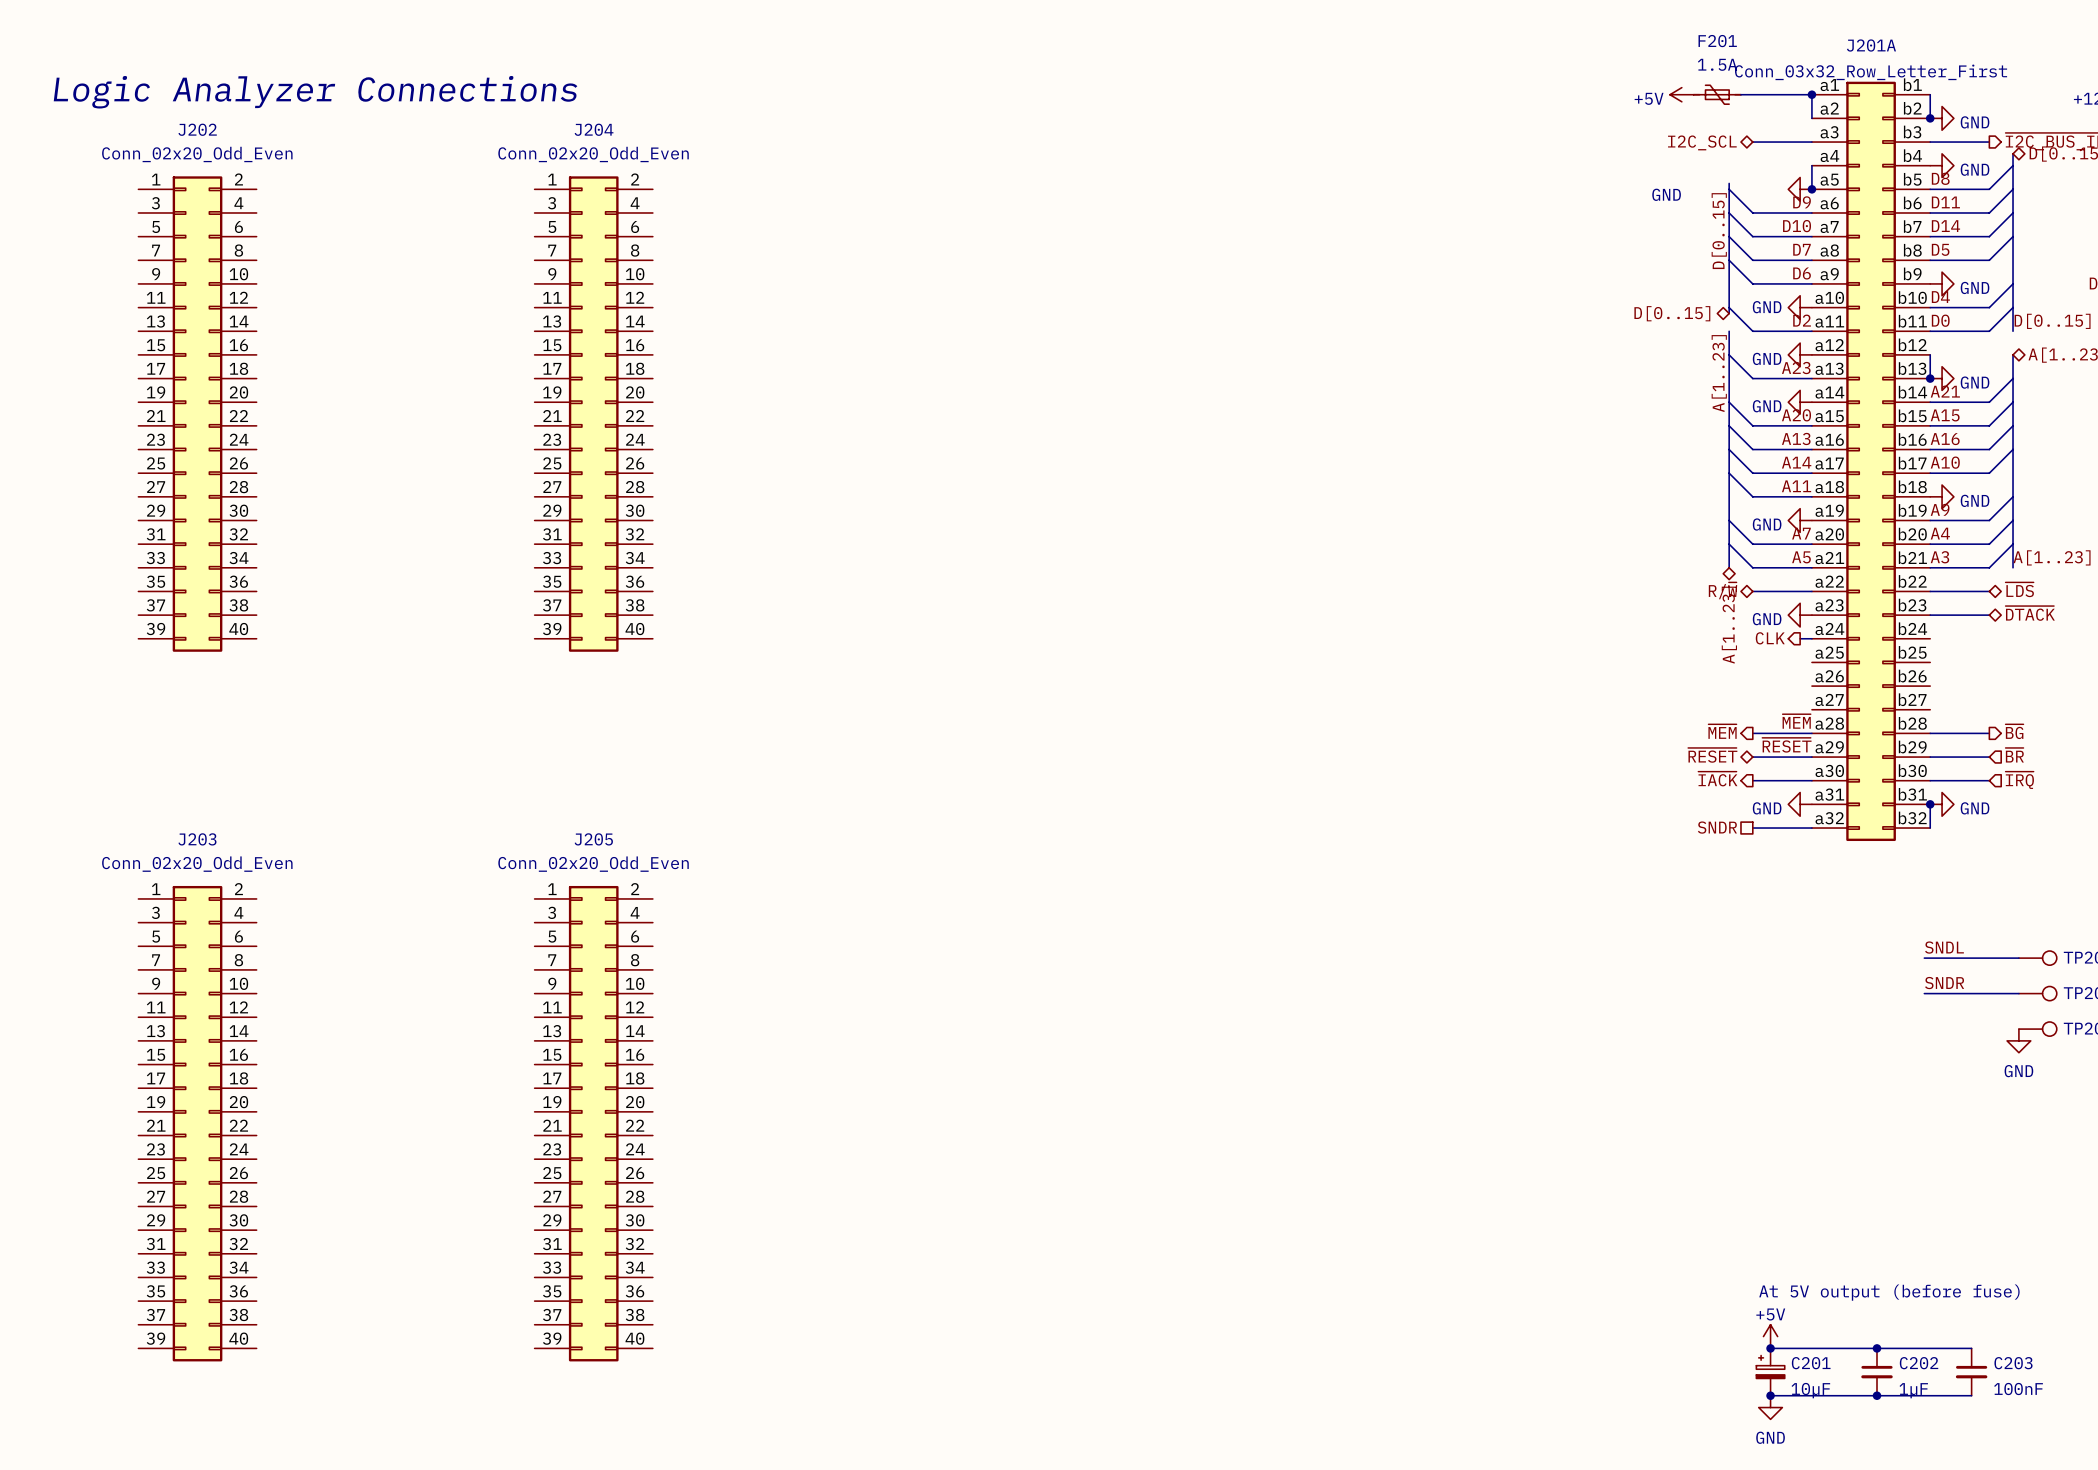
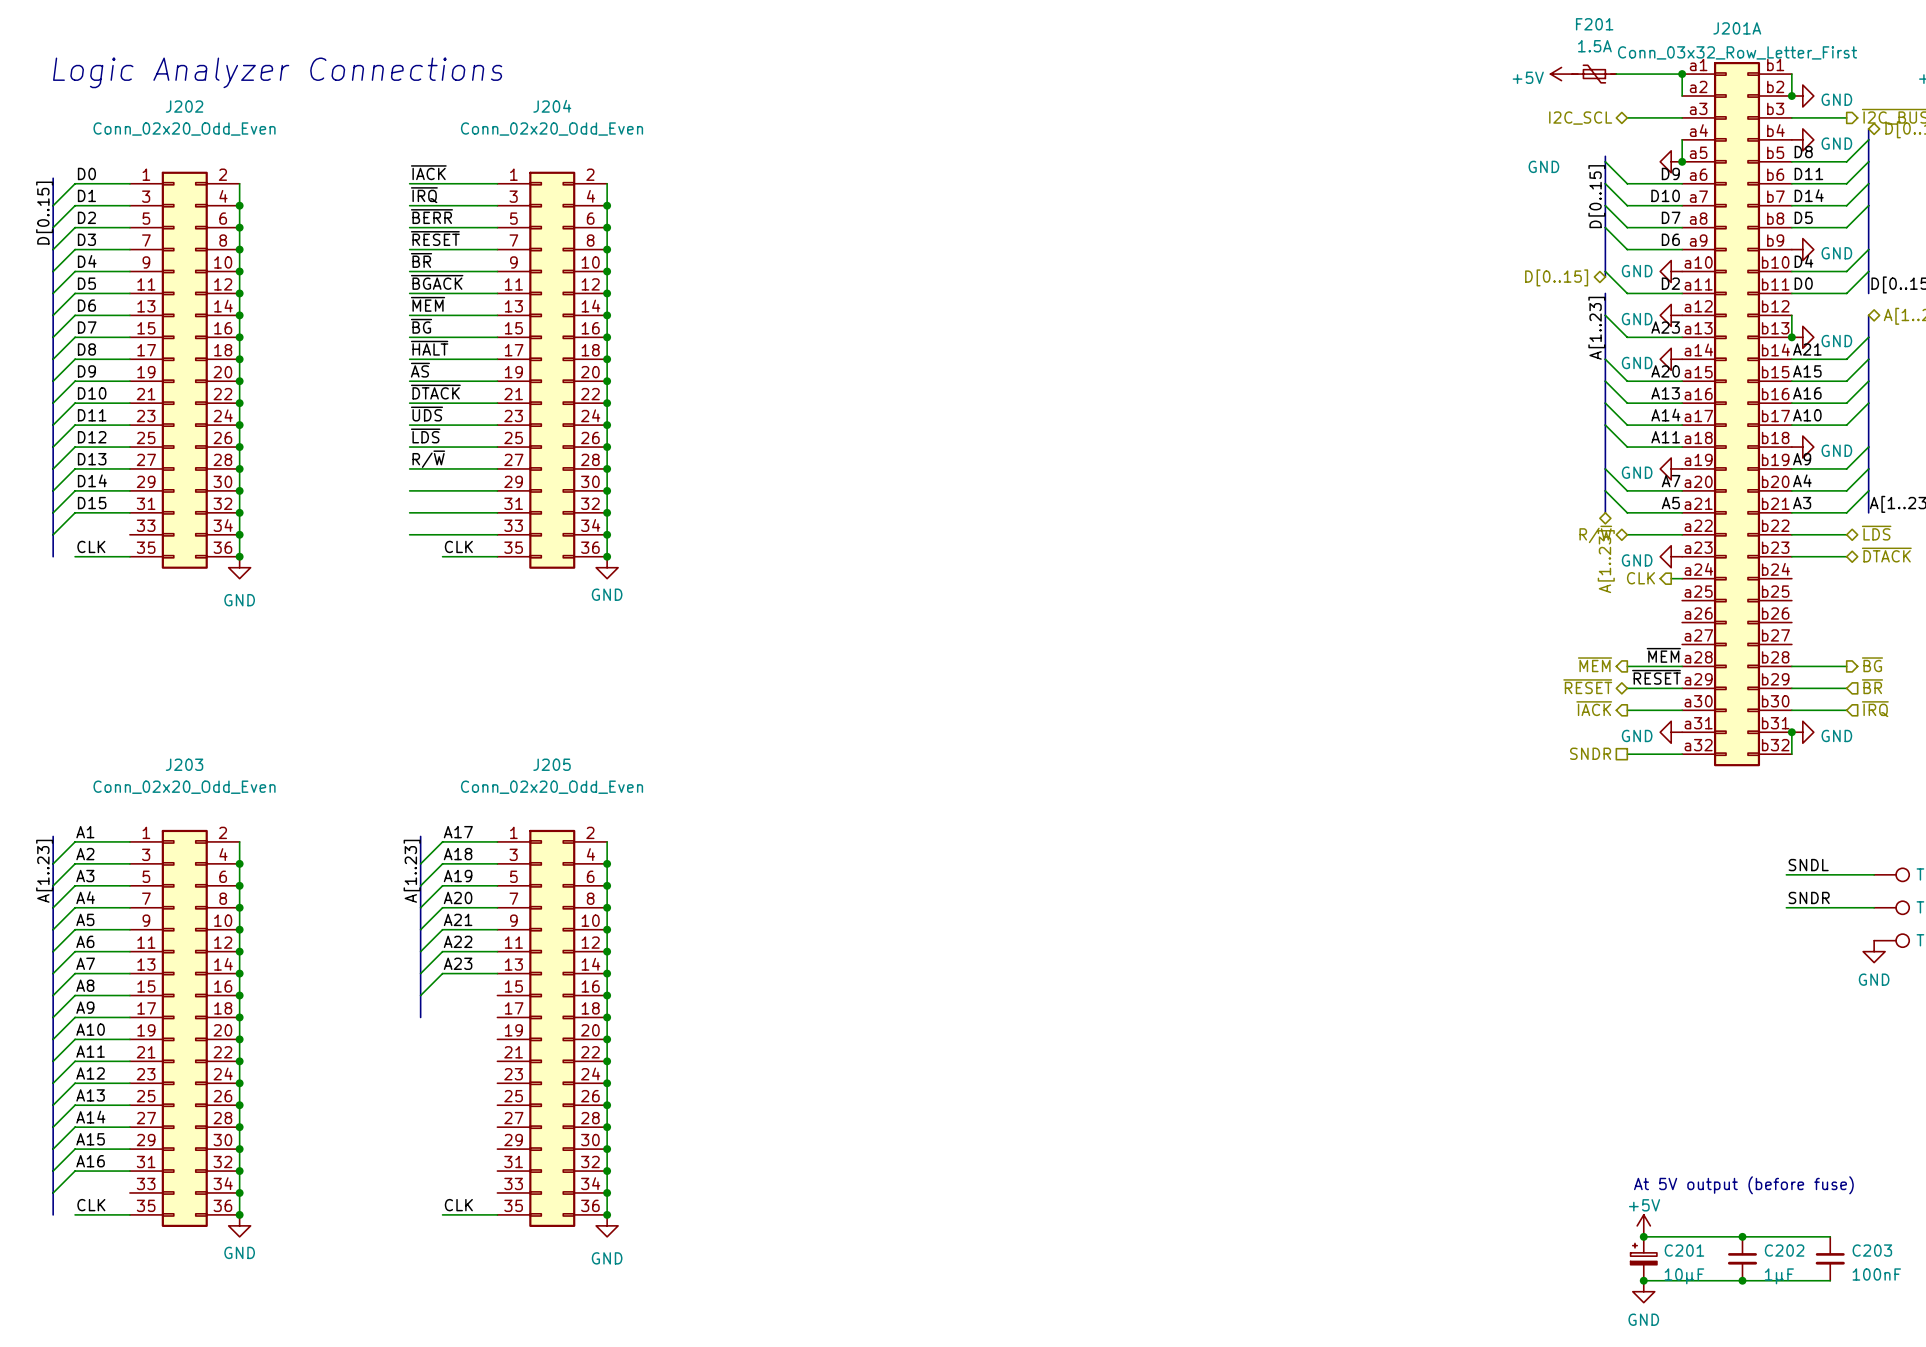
J202 symbol: [138, 176, 257, 652] -> [129, 171, 240, 569]
J204 symbol: [534, 176, 653, 652] -> [497, 171, 608, 569]
label: none -> ~{IACK} (428, 172)
label: none -> D0 (86, 173)
bus: none -> (53, 178) (53, 556)
wire: none -> (129, 183) (75, 183) (53, 205)
wire: none -> (239, 183) (239, 556)
wire: none -> (409, 183) (497, 183)
wire: none -> (607, 183) (607, 556)
label: none -> D1 (86, 195)
label: none -> ~{IRQ} (424, 195)
wire: none -> (129, 205) (75, 205) (53, 227)
junction: none -> (239, 205)
wire: none -> (409, 205) (497, 205)
junction: none -> (607, 205)
label: none -> D[0..15] (44, 213)
label: none -> ~{BERR} (431, 216)
label: none -> D2 (86, 217)
wire: none -> (129, 227) (75, 227) (53, 249)
junction: none -> (239, 227)
wire: none -> (409, 227) (497, 227)
junction: none -> (607, 227)
label: none -> ~{RESET} (435, 238)
label: none -> D3 (86, 239)
wire: none -> (129, 249) (75, 249) (53, 271)
junction: none -> (239, 249)
wire: none -> (409, 249) (497, 249)
junction: none -> (607, 249)
label: none -> ~{BR} (421, 260)
label: none -> D4 (87, 261)
wire: none -> (129, 271) (75, 271) (53, 293)
junction: none -> (239, 271)
wire: none -> (409, 271) (497, 271)
junction: none -> (607, 271)
label: none -> ~{BGACK} (437, 282)
label: none -> D5 (86, 283)
wire: none -> (129, 293) (75, 293) (53, 315)
junction: none -> (239, 293)
wire: none -> (409, 293) (497, 293)
junction: none -> (607, 293)
label: none -> ~{MEM} (428, 304)
label: none -> D6 (86, 305)
wire: none -> (129, 315) (75, 315) (53, 337)
junction: none -> (239, 315)
wire: none -> (409, 315) (497, 315)
junction: none -> (607, 315)
label: none -> ~{BG} (421, 326)
label: none -> D7 (87, 327)
wire: none -> (129, 337) (75, 337) (53, 359)
junction: none -> (239, 337)
wire: none -> (409, 337) (497, 337)
junction: none -> (607, 337)
label: none -> ~{HALT} (429, 348)
label: none -> D8 (86, 349)
wire: none -> (129, 359) (75, 359) (53, 381)
junction: none -> (239, 359)
wire: none -> (409, 359) (497, 359)
junction: none -> (607, 359)
label: none -> ~{AS} (420, 370)
label: none -> D9 (86, 371)
wire: none -> (129, 381) (75, 381) (53, 403)
junction: none -> (239, 381)
wire: none -> (409, 381) (497, 381)
junction: none -> (607, 381)
label: none -> ~{DTACK} (435, 392)
label: none -> D10 (92, 393)
wire: none -> (129, 403) (75, 403) (53, 425)
junction: none -> (239, 403)
wire: none -> (409, 403) (497, 403)
junction: none -> (607, 403)
label: none -> ~{UDS} (426, 414)
label: none -> D11 (92, 415)
wire: none -> (129, 425) (75, 425) (53, 447)
junction: none -> (239, 425)
wire: none -> (409, 425) (497, 425)
junction: none -> (607, 425)
label: none -> ~{LDS} (425, 435)
label: none -> D12 (92, 437)
wire: none -> (129, 447) (75, 447) (53, 468)
junction: none -> (239, 447)
wire: none -> (409, 447) (497, 447)
junction: none -> (607, 447)
label: none -> D13 (92, 459)
label: none -> R/~{W} (428, 459)
wire: none -> (129, 468) (75, 468) (53, 490)
junction: none -> (239, 468)
wire: none -> (409, 468) (497, 468)
junction: none -> (607, 468)
label: none -> D14 (92, 480)
wire: none -> (129, 490) (75, 490) (53, 512)
junction: none -> (239, 490)
wire: none -> (409, 490) (497, 490)
junction: none -> (607, 490)
label: none -> D15 (92, 503)
wire: none -> (129, 512) (75, 512) (53, 534)
junction: none -> (239, 512)
wire: none -> (409, 512) (497, 512)
junction: none -> (607, 512)
junction: none -> (239, 534)
wire: none -> (409, 534) (497, 534)
junction: none -> (607, 534)
label: none -> CLK (91, 546)
label: none -> CLK (458, 546)
wire: none -> (75, 556) (129, 556)
junction: none -> (239, 556)
wire: none -> (442, 556) (497, 556)
junction: none -> (607, 556)
power symbol: none -> GND (239, 567)
power symbol: none -> GND (607, 567)
J203 symbol: [138, 885, 257, 1362] -> [129, 829, 240, 1227]
J205 symbol: [534, 885, 653, 1362] -> [497, 829, 608, 1227]
label: none -> A1 (85, 832)
label: none -> A17 (458, 832)
bus: none -> (53, 836) (53, 1214)
bus: none -> (420, 836) (420, 1017)
wire: none -> (129, 841) (75, 841) (53, 863)
wire: none -> (239, 841) (239, 1214)
wire: none -> (442, 841) (497, 841)
wire: none -> (442, 841) (420, 863)
wire: none -> (607, 841) (607, 1214)
label: none -> A2 (85, 854)
label: none -> A18 (458, 854)
wire: none -> (129, 863) (75, 863) (53, 885)
junction: none -> (239, 863)
wire: none -> (442, 863) (497, 863)
wire: none -> (442, 863) (420, 885)
junction: none -> (607, 863)
label: none -> A[1..23] (44, 871)
label: none -> A3 (85, 876)
label: none -> A[1..23] (412, 871)
label: none -> A19 (458, 876)
wire: none -> (129, 885) (75, 885) (53, 907)
junction: none -> (239, 885)
wire: none -> (442, 885) (497, 885)
wire: none -> (442, 885) (420, 907)
junction: none -> (607, 885)
label: none -> A4 (85, 897)
label: none -> A20 (458, 897)
wire: none -> (129, 907) (75, 907) (53, 929)
junction: none -> (239, 907)
wire: none -> (442, 907) (497, 907)
wire: none -> (442, 907) (420, 929)
junction: none -> (607, 907)
label: none -> A5 (85, 919)
label: none -> A21 (458, 919)
wire: none -> (129, 929) (75, 929) (53, 951)
junction: none -> (239, 929)
wire: none -> (442, 929) (497, 929)
wire: none -> (442, 929) (420, 951)
junction: none -> (607, 929)
label: none -> A6 (85, 941)
label: none -> A22 (458, 941)
wire: none -> (129, 951) (75, 951) (53, 973)
junction: none -> (239, 951)
wire: none -> (442, 951) (497, 951)
wire: none -> (442, 951) (420, 973)
junction: none -> (607, 951)
label: none -> A7 (85, 963)
label: none -> A23 (458, 963)
wire: none -> (129, 973) (75, 973) (53, 995)
junction: none -> (239, 973)
wire: none -> (442, 973) (497, 973)
wire: none -> (442, 973) (420, 995)
junction: none -> (607, 973)
label: none -> A8 (85, 985)
wire: none -> (129, 995) (75, 995) (53, 1017)
junction: none -> (239, 995)
junction: none -> (607, 995)
label: none -> A9 (85, 1007)
wire: none -> (129, 1017) (75, 1017) (53, 1039)
junction: none -> (239, 1017)
junction: none -> (607, 1017)
label: none -> A10 (90, 1029)
wire: none -> (129, 1039) (75, 1039) (53, 1061)
junction: none -> (239, 1039)
junction: none -> (607, 1039)
label: none -> A11 (90, 1051)
wire: none -> (129, 1061) (75, 1061) (53, 1083)
junction: none -> (239, 1061)
junction: none -> (607, 1061)
label: none -> A12 (90, 1073)
wire: none -> (129, 1083) (75, 1083) (53, 1105)
junction: none -> (239, 1083)
junction: none -> (607, 1083)
label: none -> A13 (90, 1095)
wire: none -> (129, 1105) (75, 1105) (53, 1127)
junction: none -> (239, 1105)
junction: none -> (607, 1105)
label: none -> A14 (90, 1117)
wire: none -> (129, 1127) (75, 1127) (53, 1149)
junction: none -> (239, 1127)
junction: none -> (607, 1127)
label: none -> A15 (90, 1139)
wire: none -> (129, 1149) (75, 1149) (53, 1171)
junction: none -> (239, 1149)
junction: none -> (607, 1149)
label: none -> A16 (90, 1161)
wire: none -> (129, 1171) (75, 1171) (53, 1192)
junction: none -> (239, 1171)
junction: none -> (607, 1171)
junction: none -> (239, 1192)
junction: none -> (607, 1192)
label: none -> CLK (91, 1205)
label: none -> CLK (458, 1205)
wire: none -> (75, 1214) (129, 1214)
junction: none -> (239, 1214)
wire: none -> (442, 1214) (497, 1214)
junction: none -> (607, 1214)
power symbol: none -> GND (239, 1225)
power symbol: none -> GND (607, 1225)

